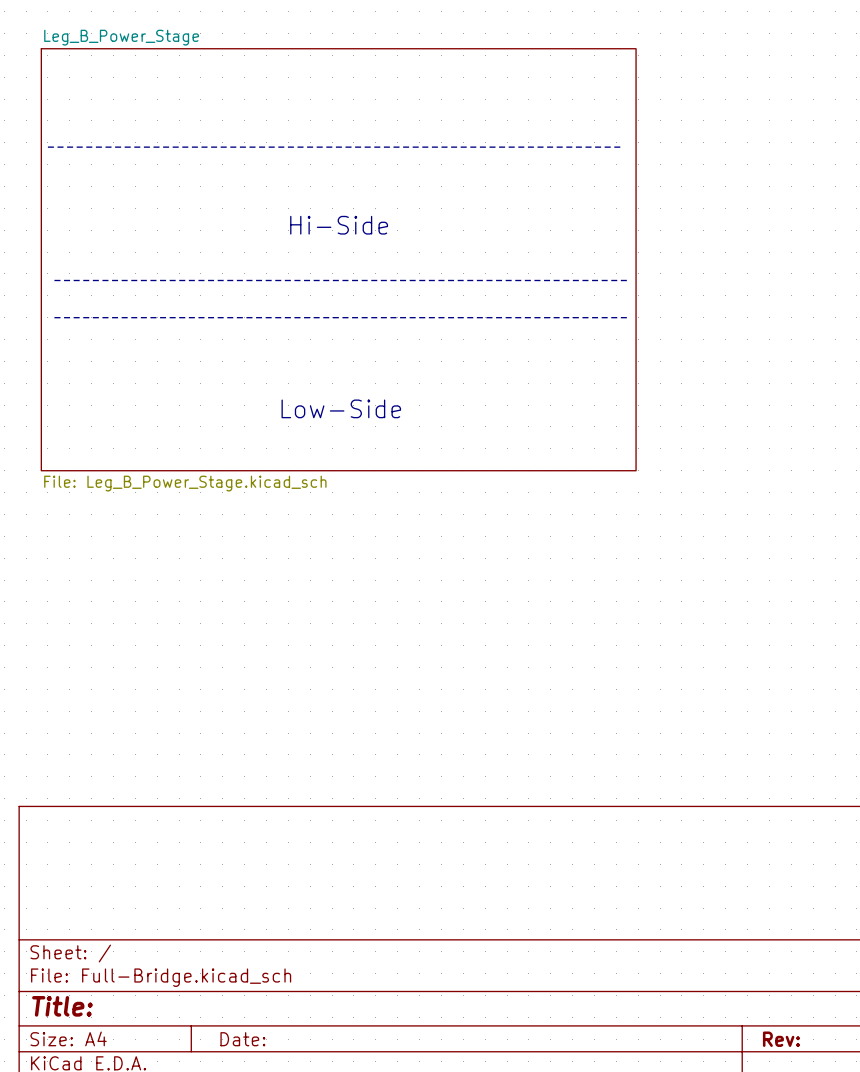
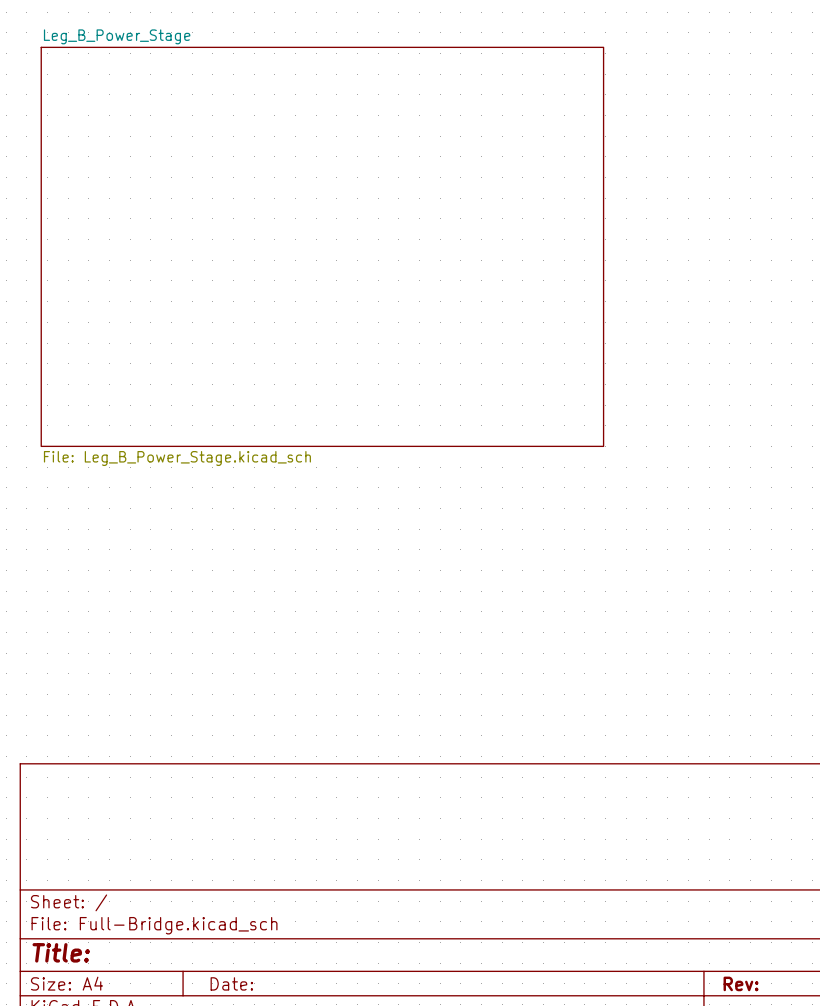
line: (47, 147) (622, 147) -> none
text: Hi-Side (339, 225) -> none
line: (54, 280) (629, 280) -> none
line: (54, 317) (629, 317) -> none
text: Low-Side (341, 408) -> none

